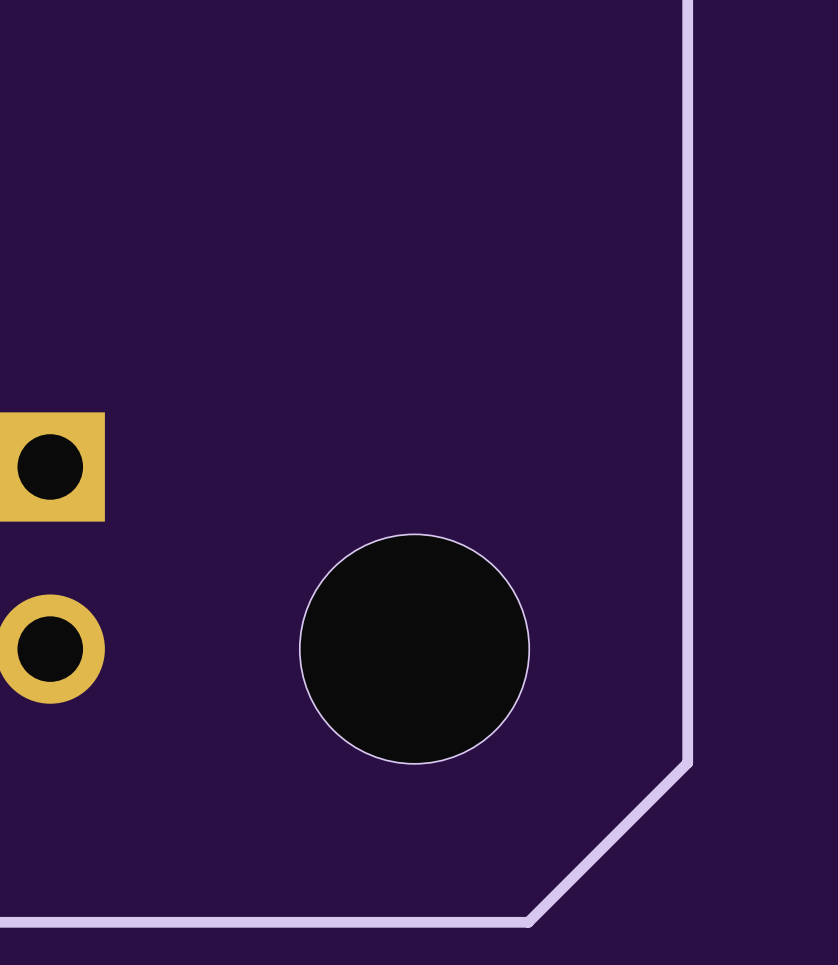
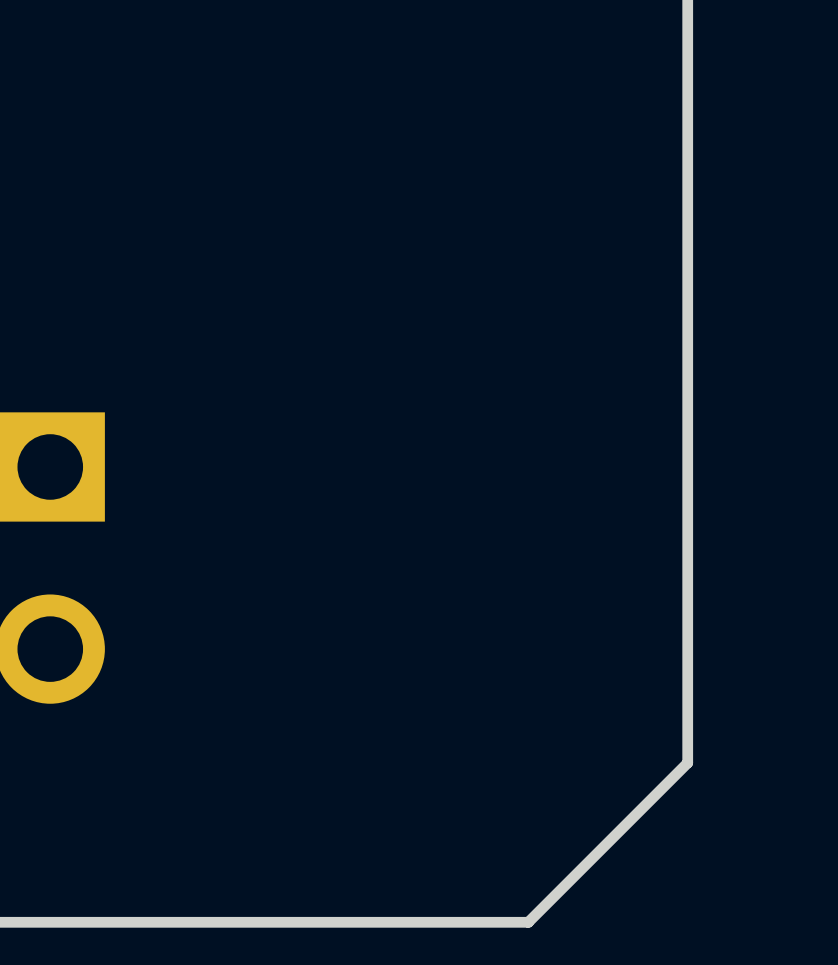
part: (414, 649) -> none

